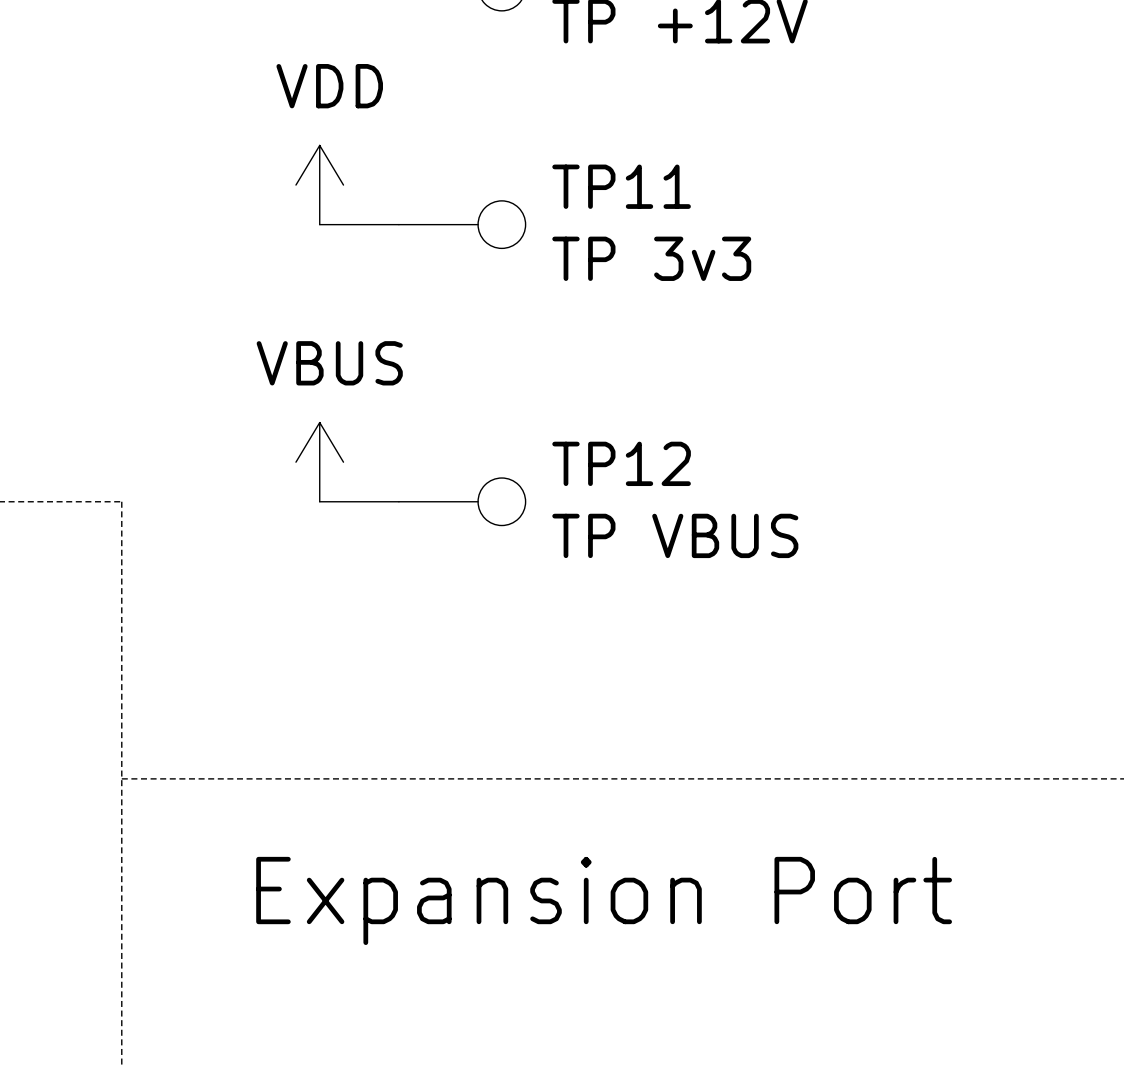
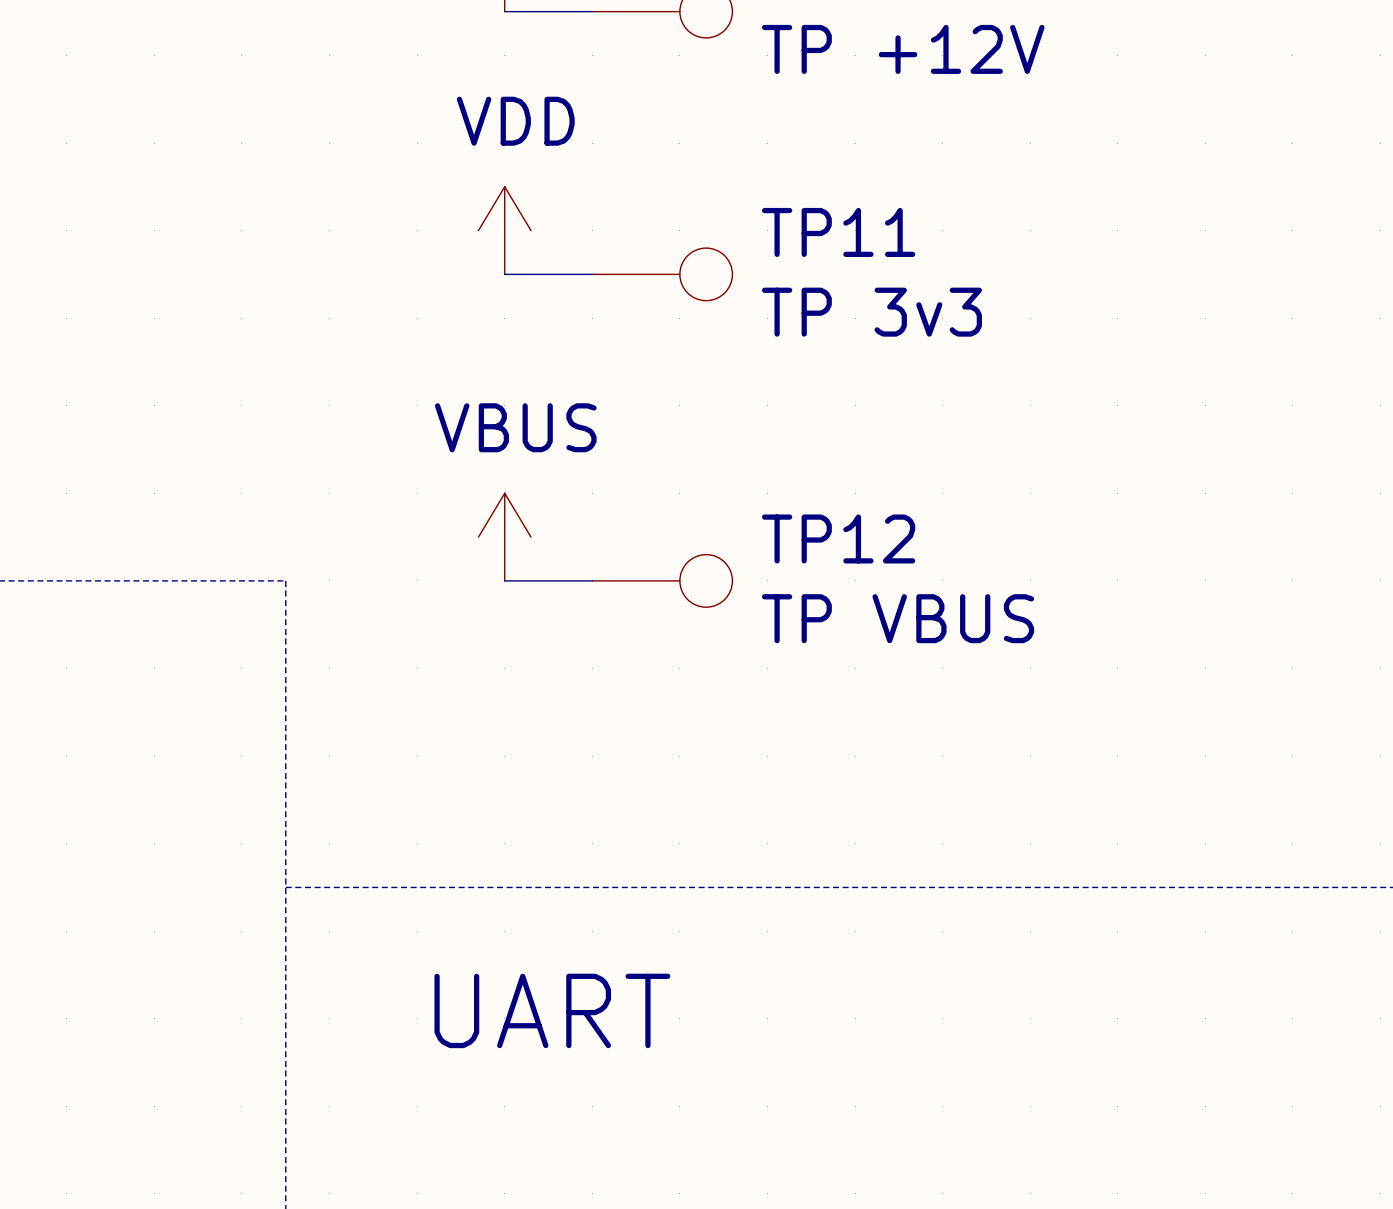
text: Expansion Port (604, 900) -> UART (552, 1010)

